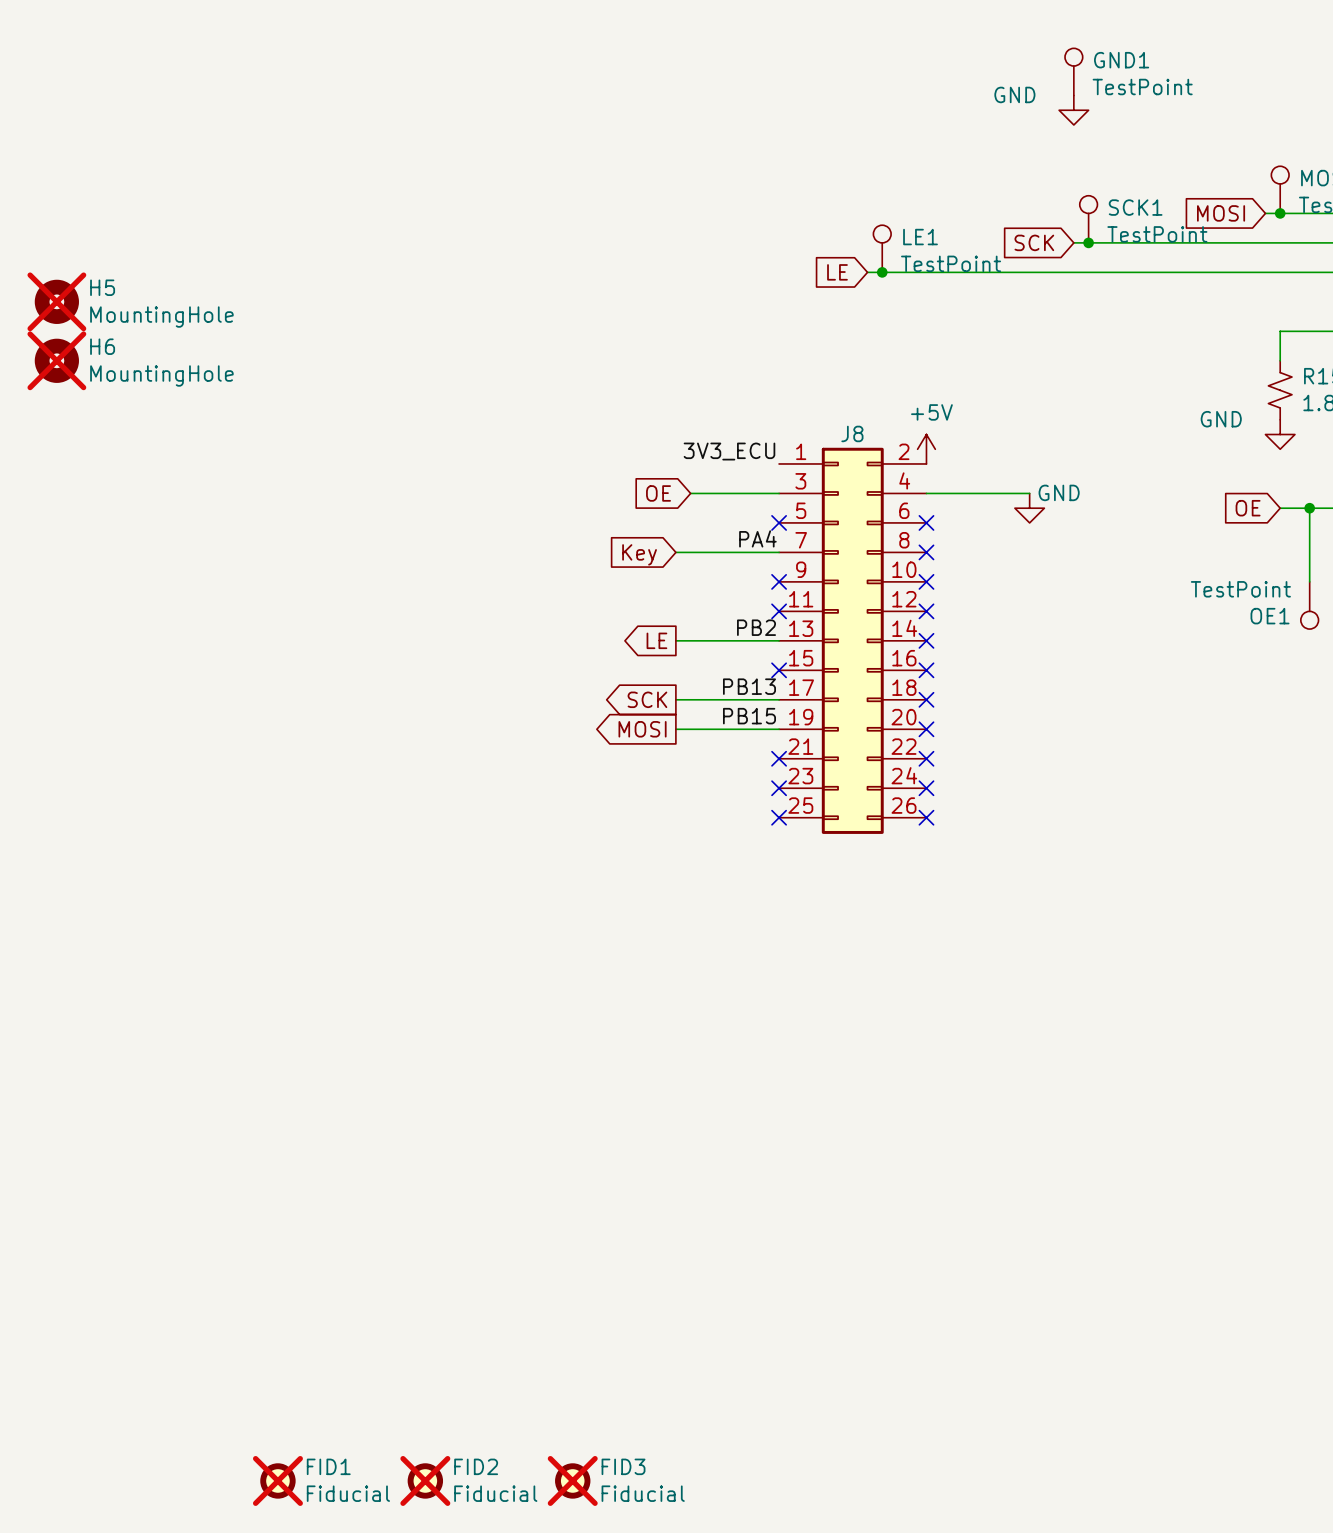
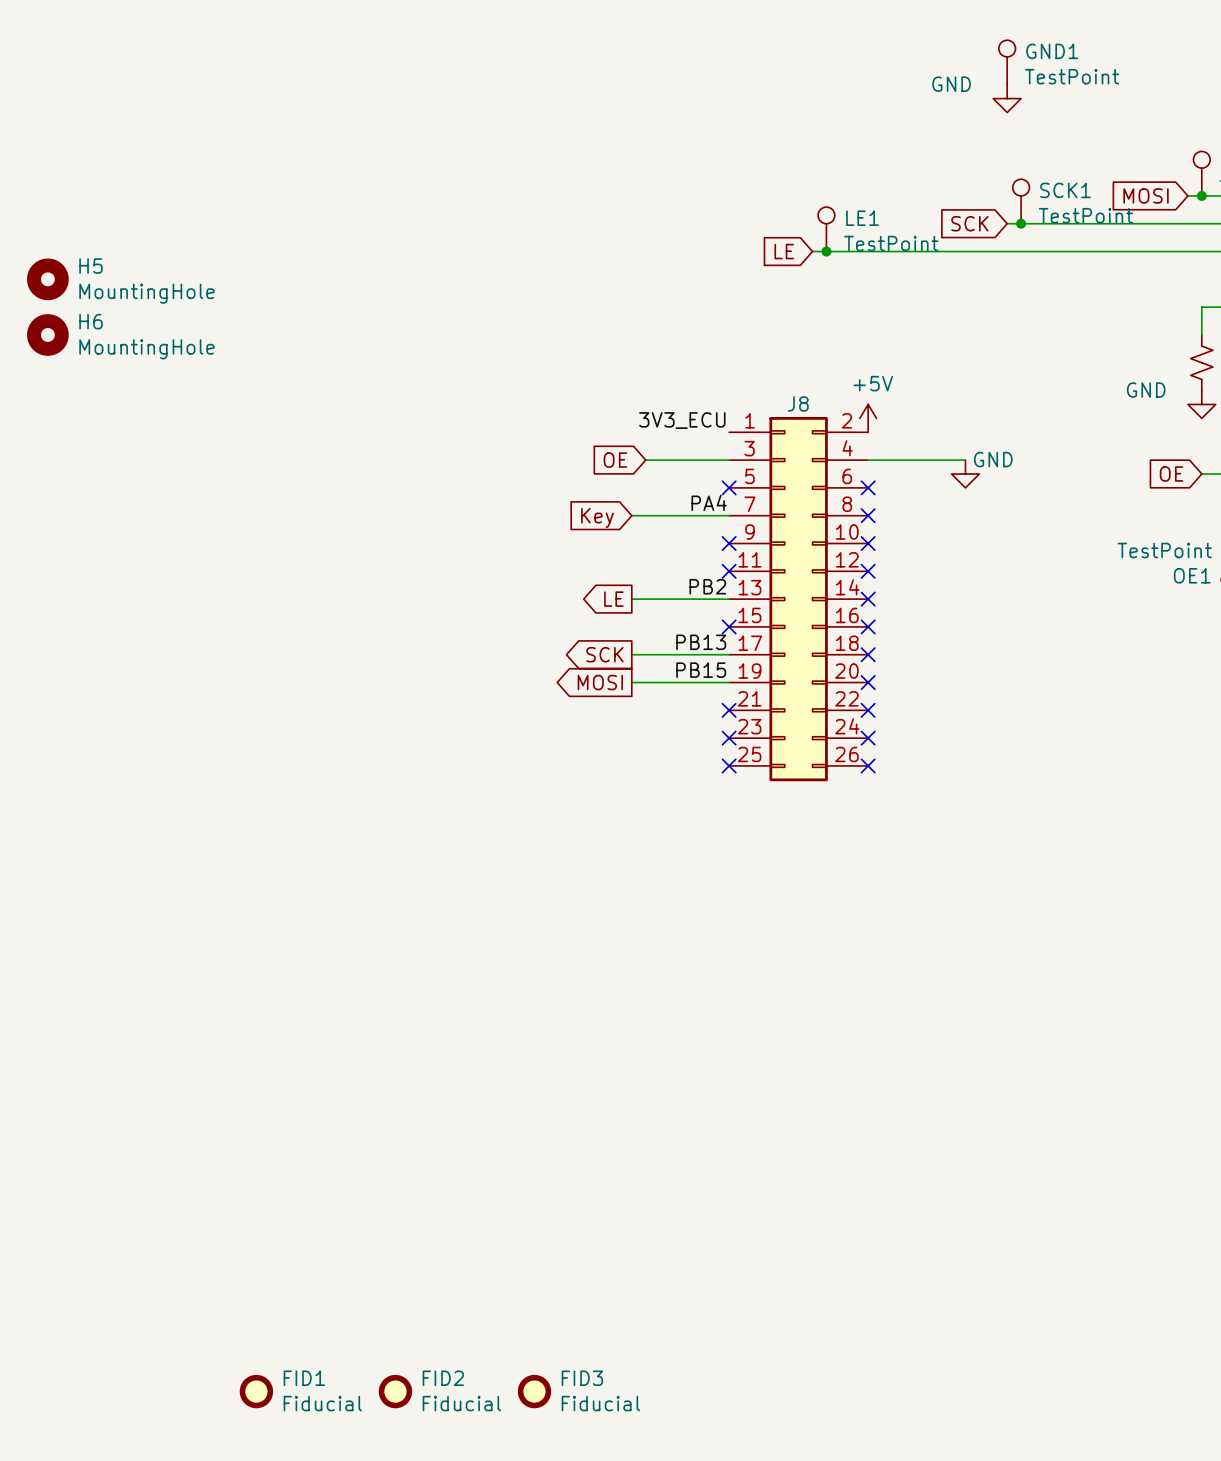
H5 do-not-place cross: (56, 301) -> none
H6 do-not-place cross: (56, 360) -> none
FID1 do-not-place cross: (277, 1480) -> none
FID2 do-not-place cross: (425, 1480) -> none
FID3 do-not-place cross: (572, 1480) -> none

